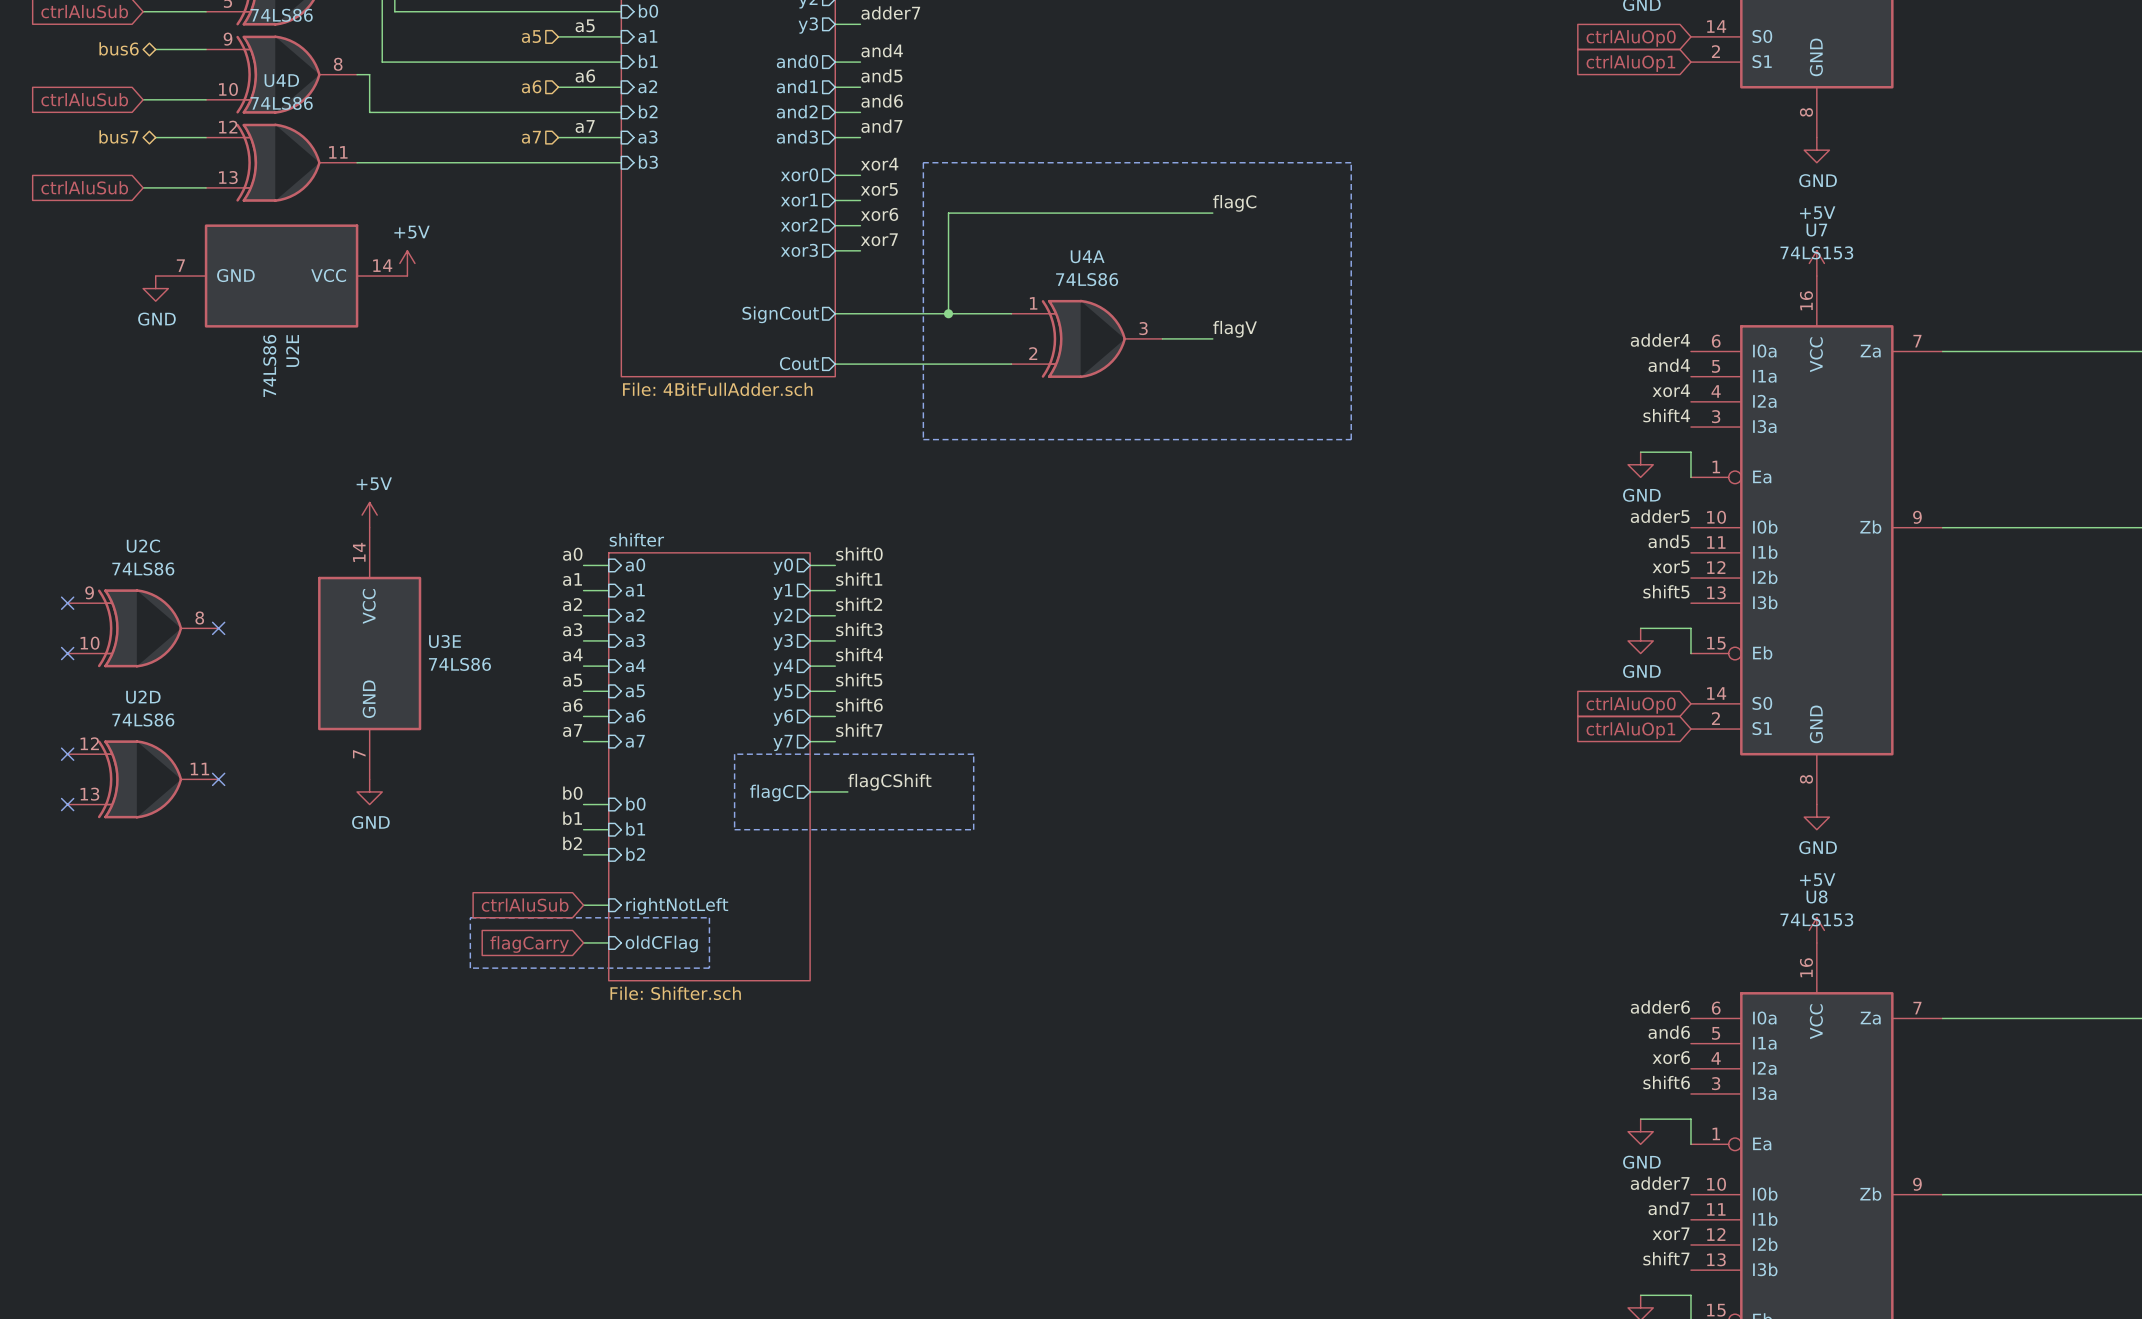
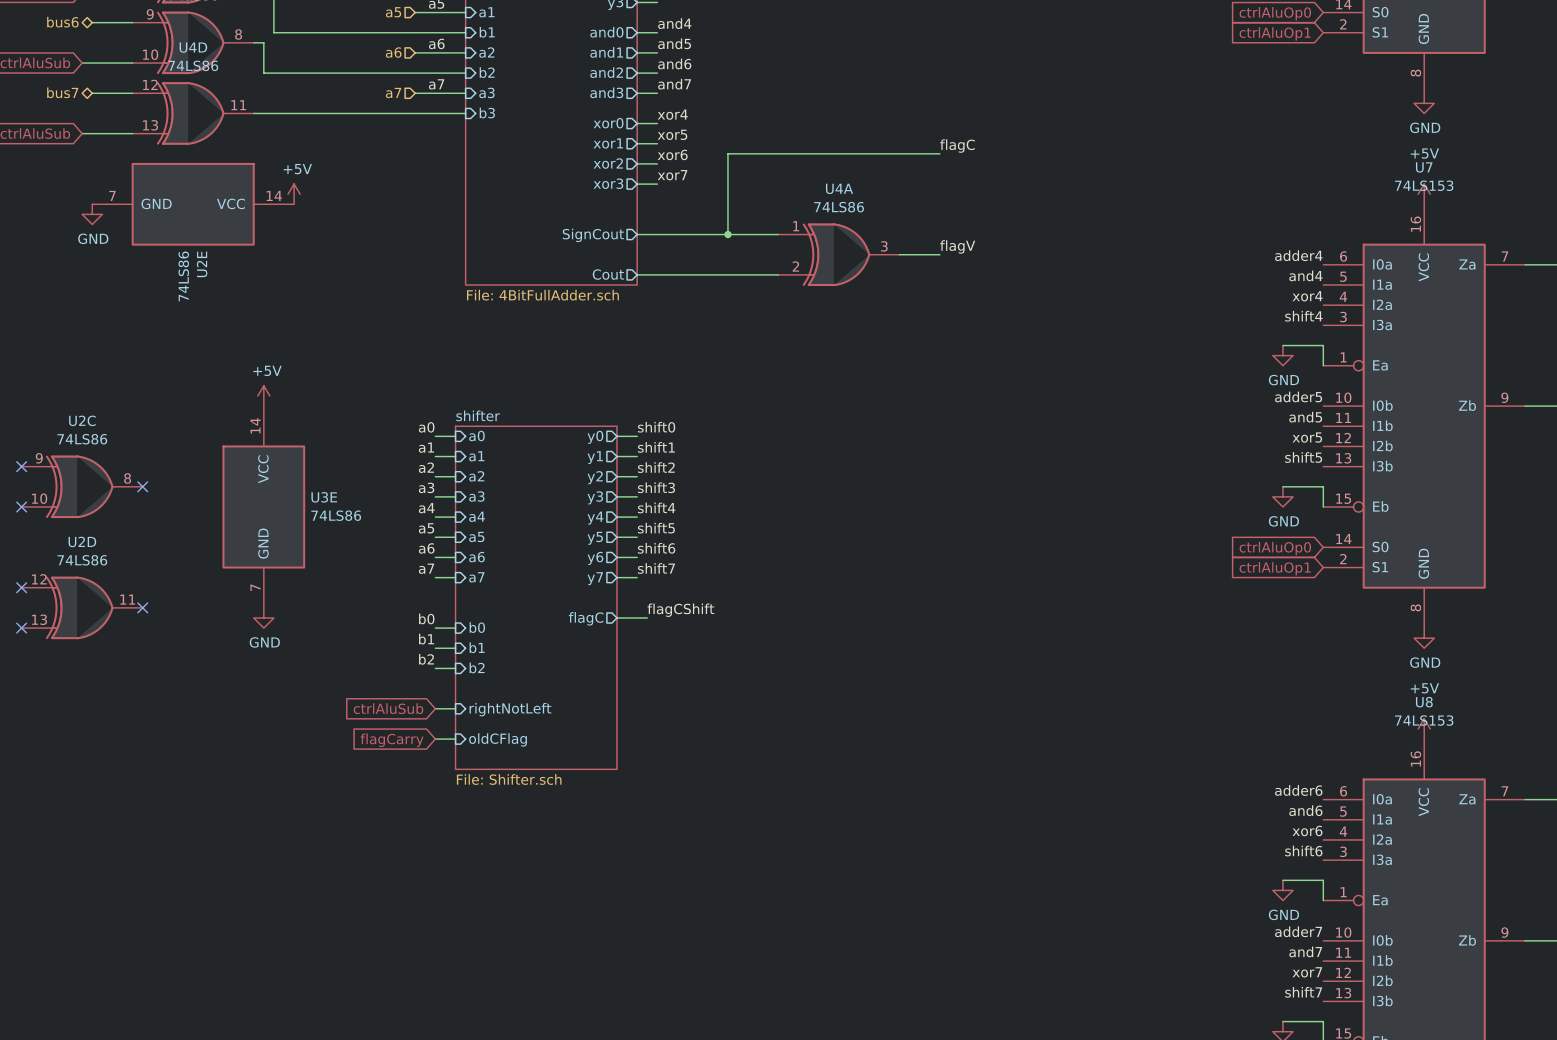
line: (923, 162) (923, 439) (1351, 439) (1351, 162) (923, 162) -> none
line: (734, 754) (973, 754) (973, 829) (734, 829) (734, 754) -> none
line: (470, 917) (709, 917) (709, 968) (470, 968) (470, 917) -> none

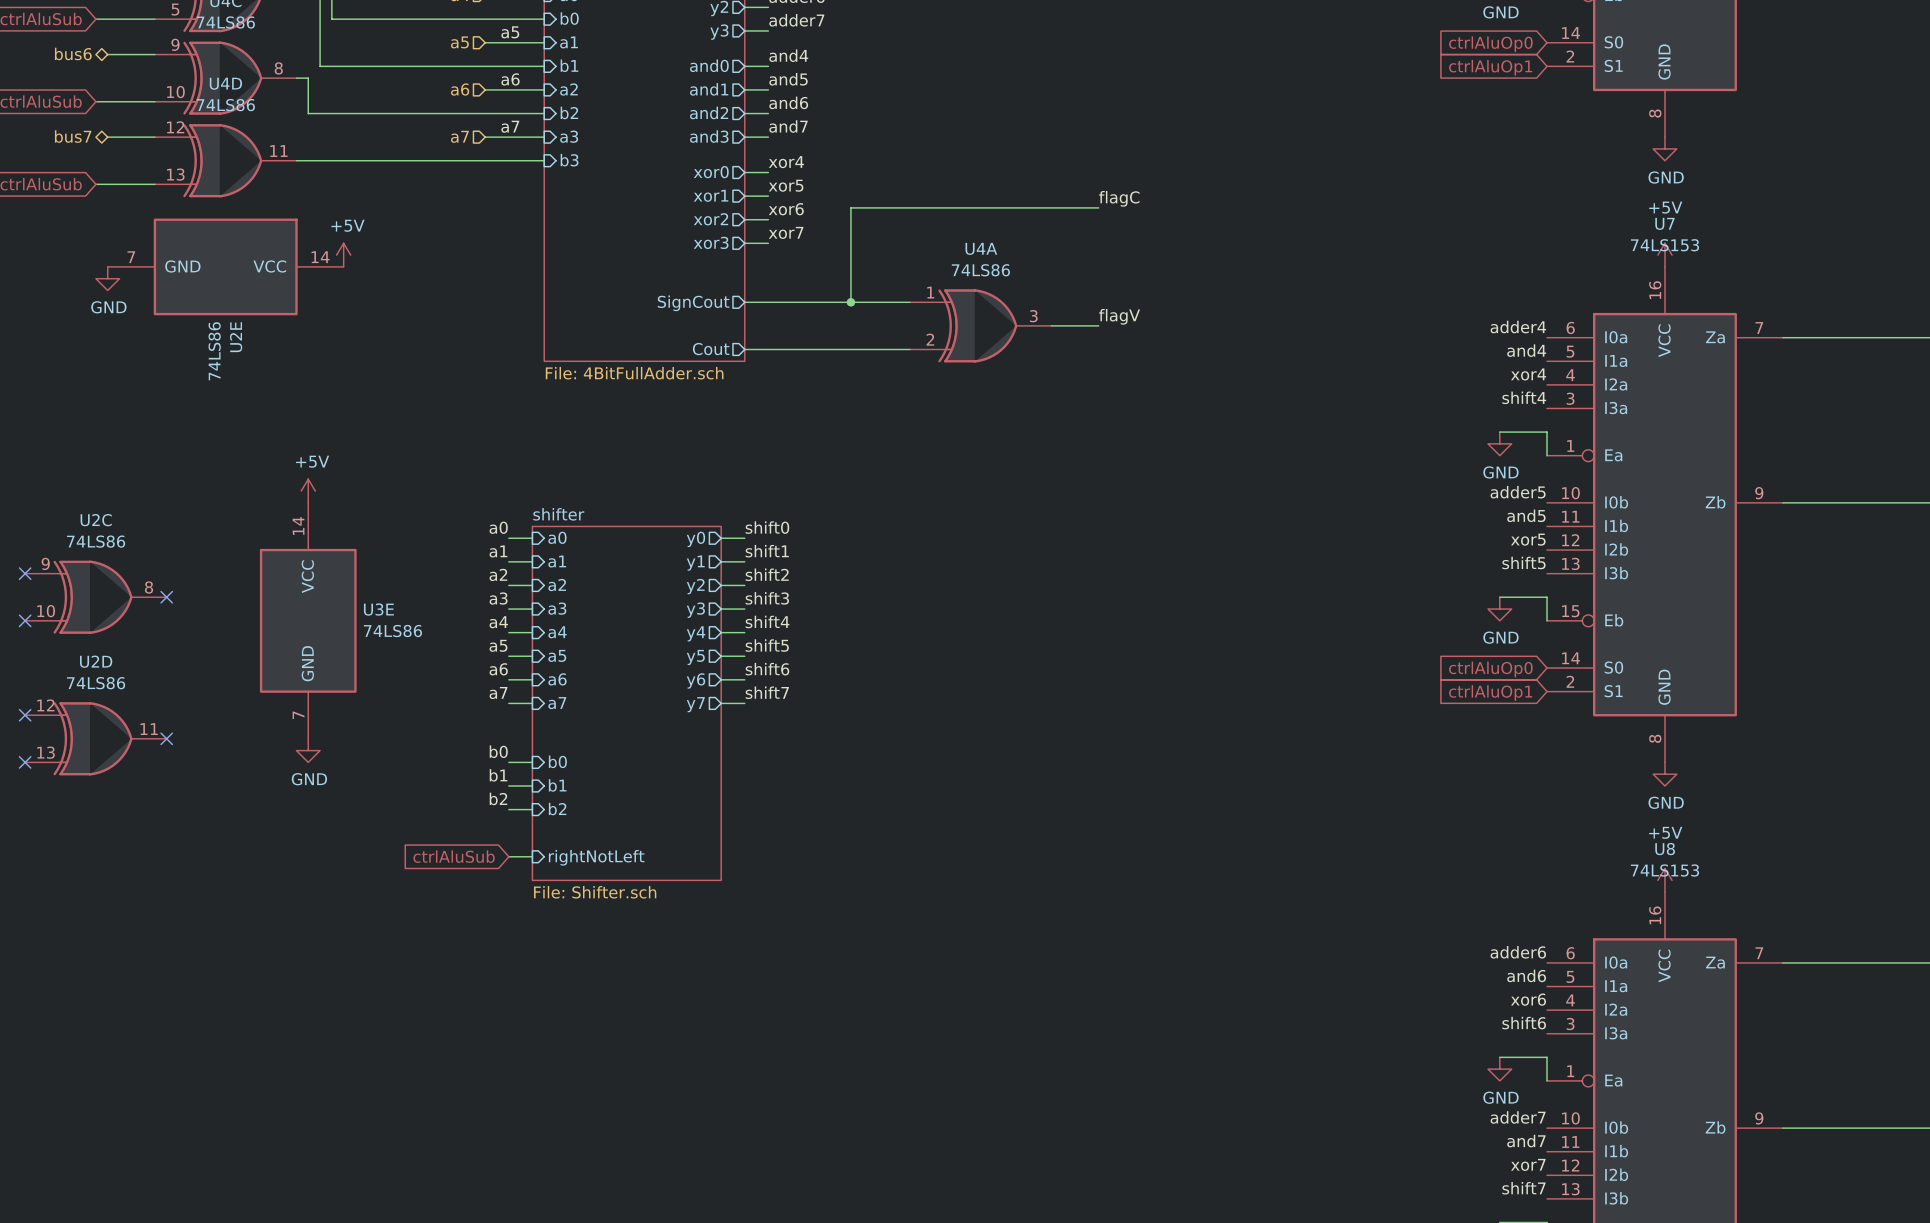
sheet shifter: none -> File: Shifter.sch (626, 703)
sheet shifter: File: Shifter.sch (536, 597) -> none
label: flagCShift (680, 610) -> none
wire: (616, 617) (647, 617) -> none
sheet pin: flagC (586, 618) -> none
wire: (435, 739) (455, 739) -> none
sheet pin: oldCFlag (498, 739) -> none
global label: flagCarry (392, 740) -> none

